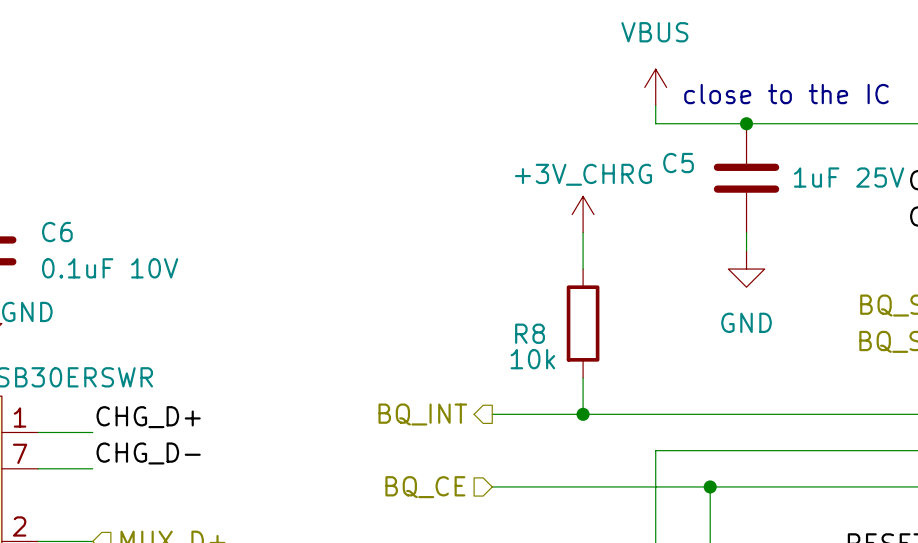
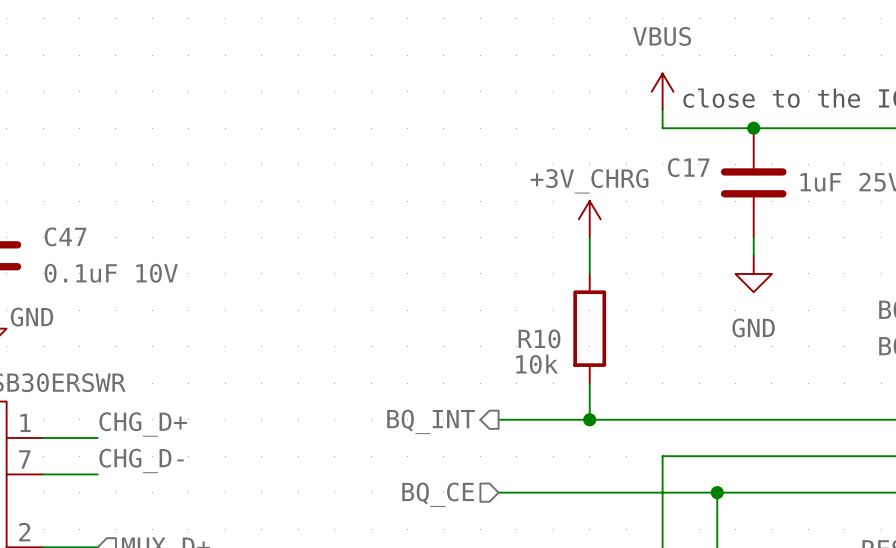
C5 name: C5 (678, 163) -> C17 (688, 167)
C6 name: C6 (57, 232) -> C47 (65, 236)
R8 name: R8 (530, 333) -> R10 (539, 338)

